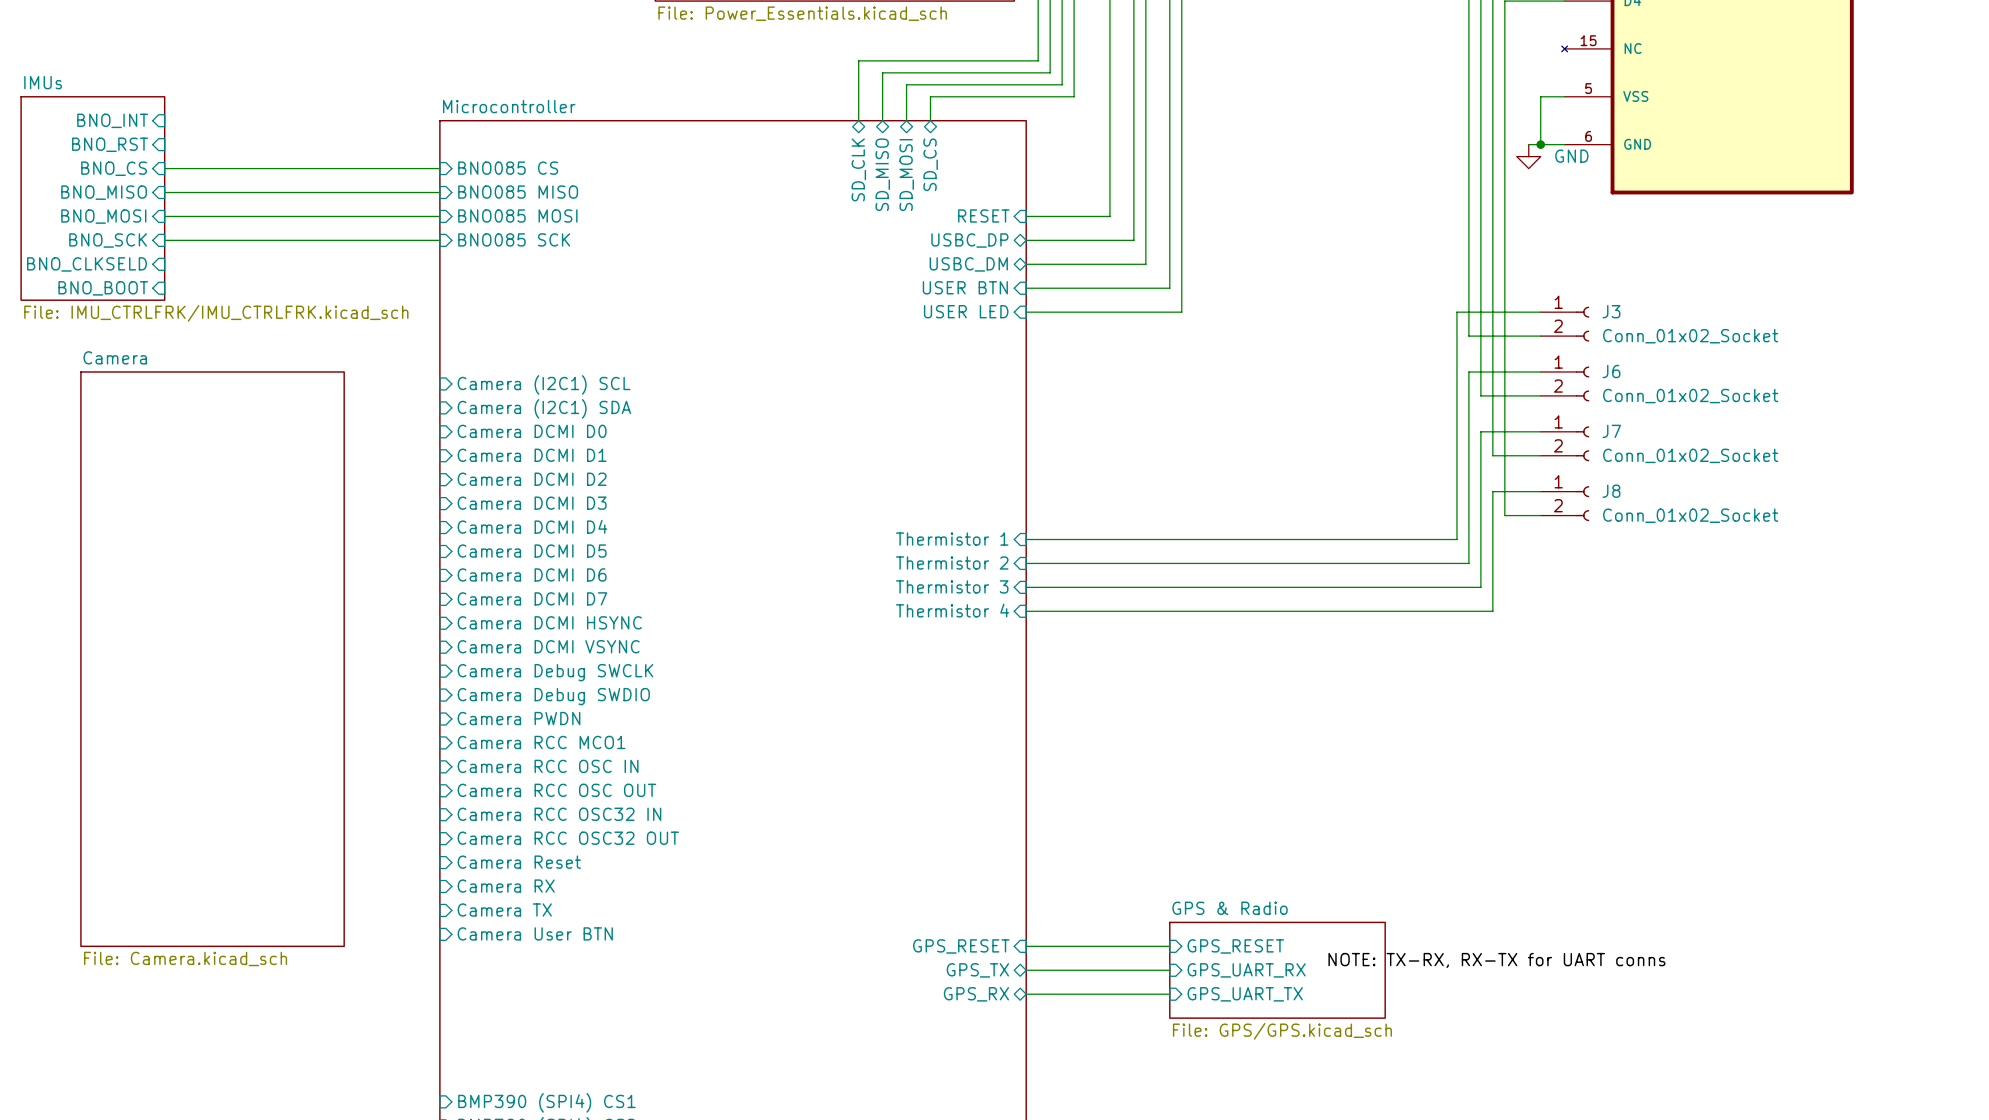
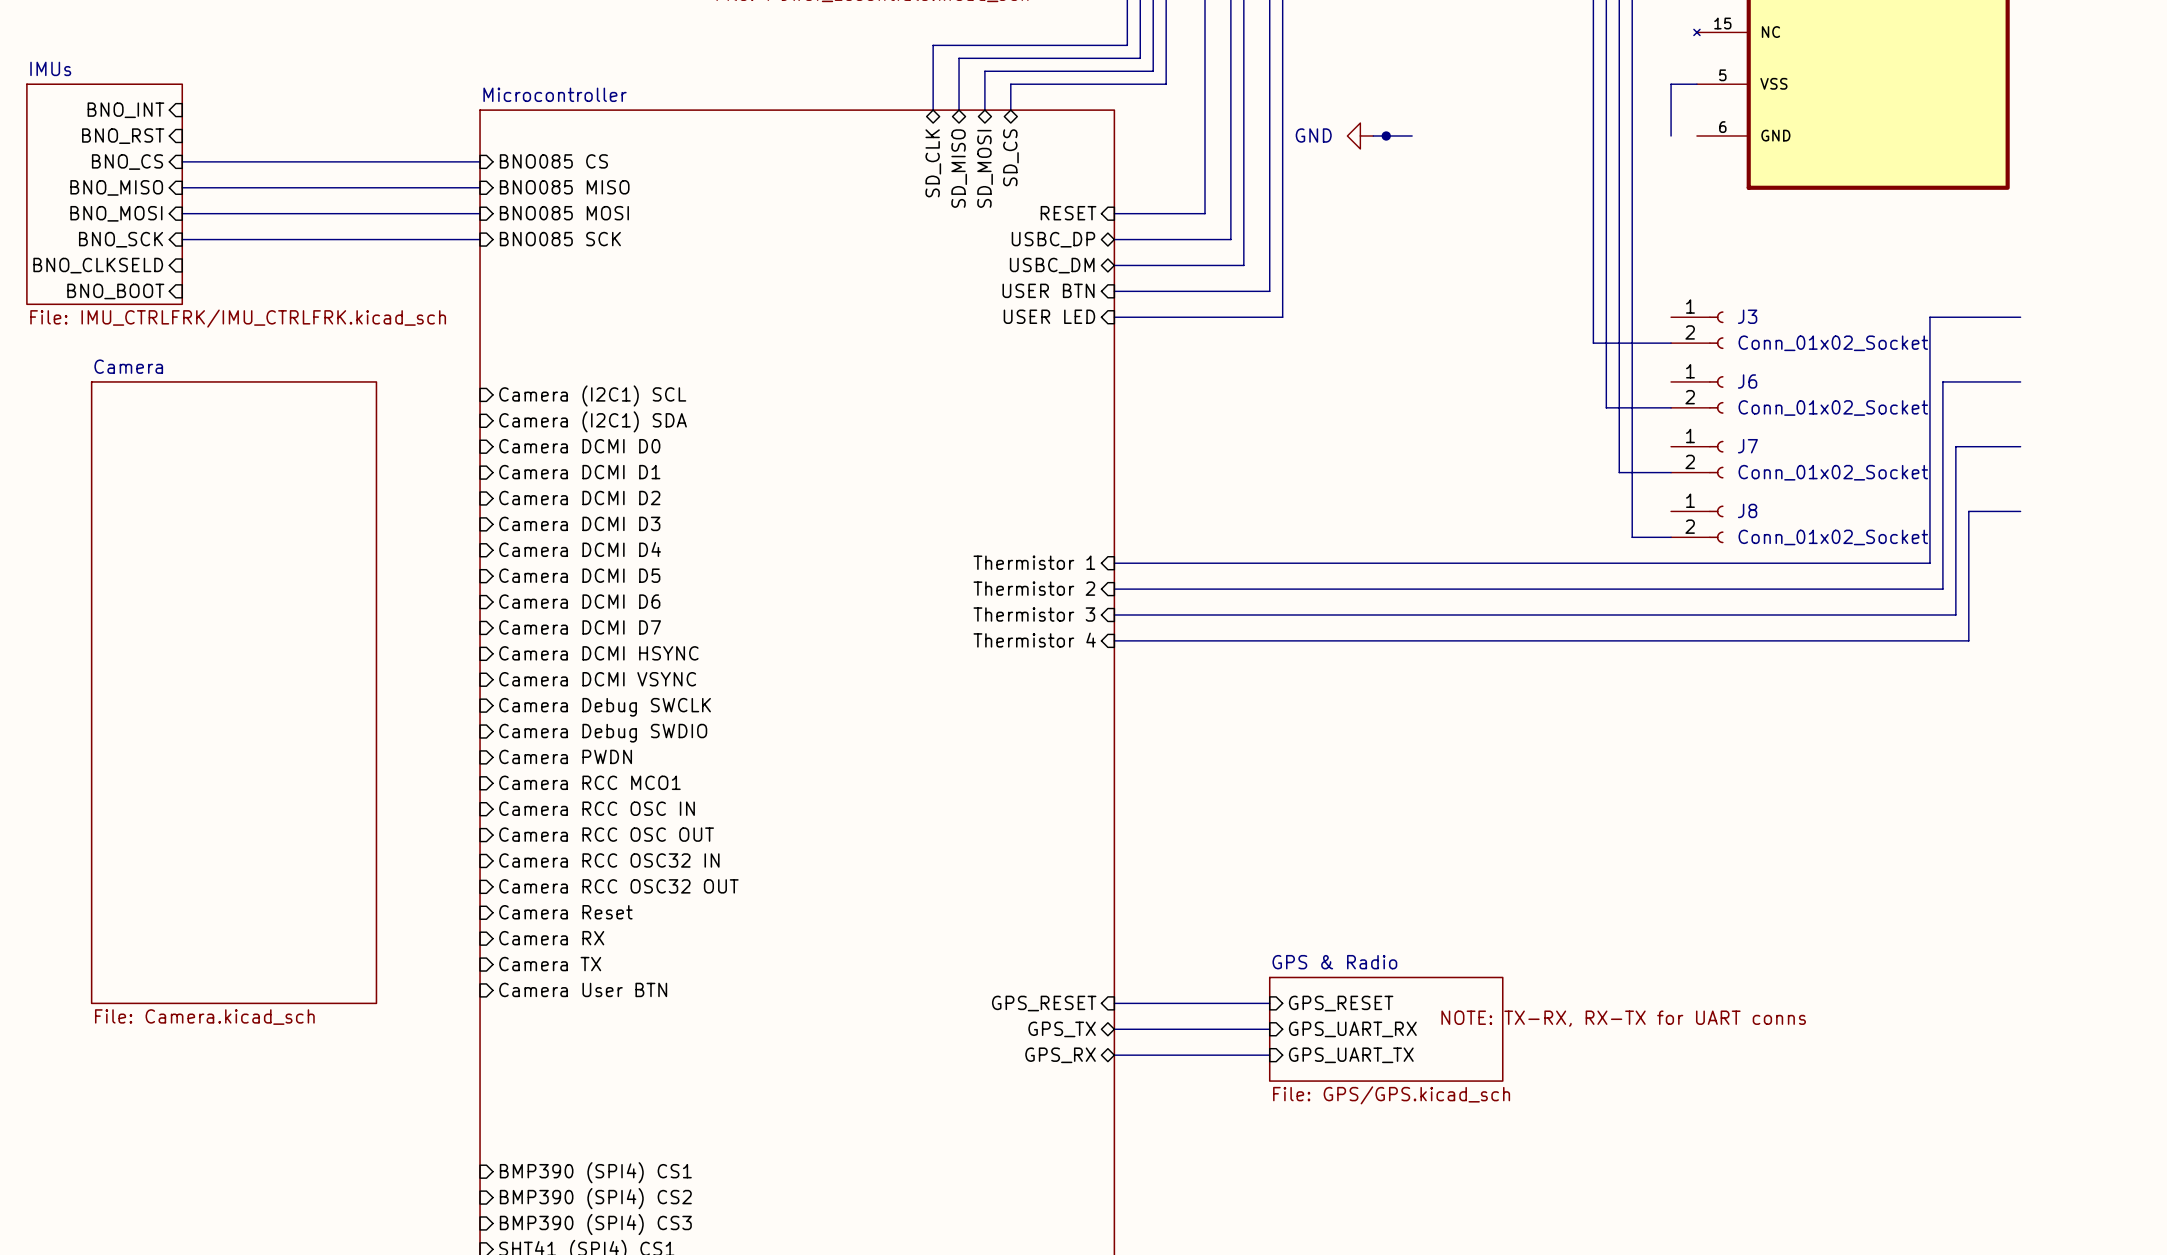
power symbol: none -> GND (1360, 135)
wire: none -> (1373, 135) (1412, 135)
junction: none -> (1386, 135)
wire: (1528, 144) (1564, 144) -> none
junction: (1540, 144) -> none
power symbol: GND (1528, 156) -> none
wire: (1540, 312) (1456, 312) (1456, 539) -> (2020, 317) (1929, 317) (1929, 563) (1580, 563)
wire: (1540, 371) (1468, 371) (1468, 563) -> (2020, 381) (1942, 381) (1942, 589) (1593, 589)
wire: (1540, 431) (1480, 431) (1480, 587) -> (2020, 446) (1955, 446) (1955, 615) (1606, 615)
wire: (1540, 491) (1492, 491) (1492, 611) -> (2020, 511) (1968, 511) (1968, 640) (1619, 640)

